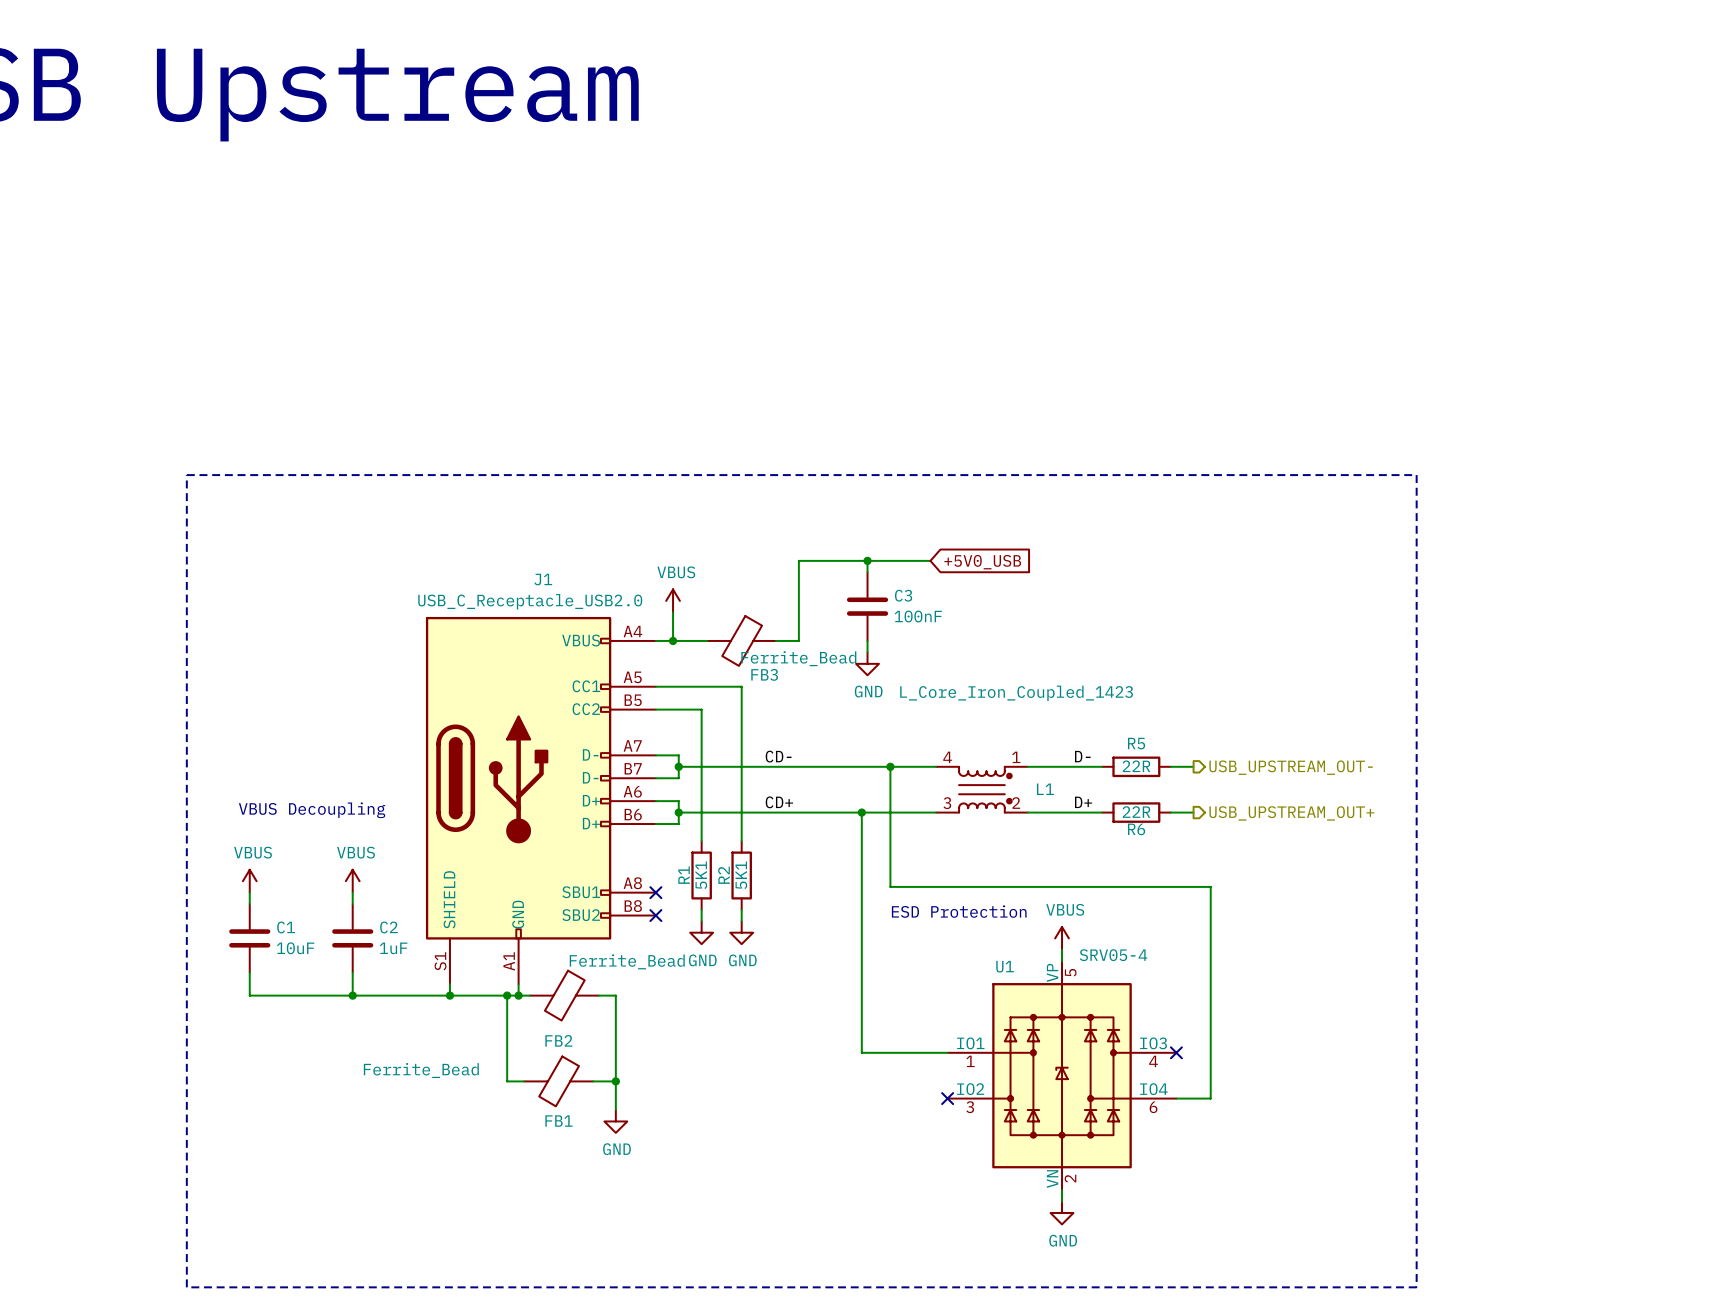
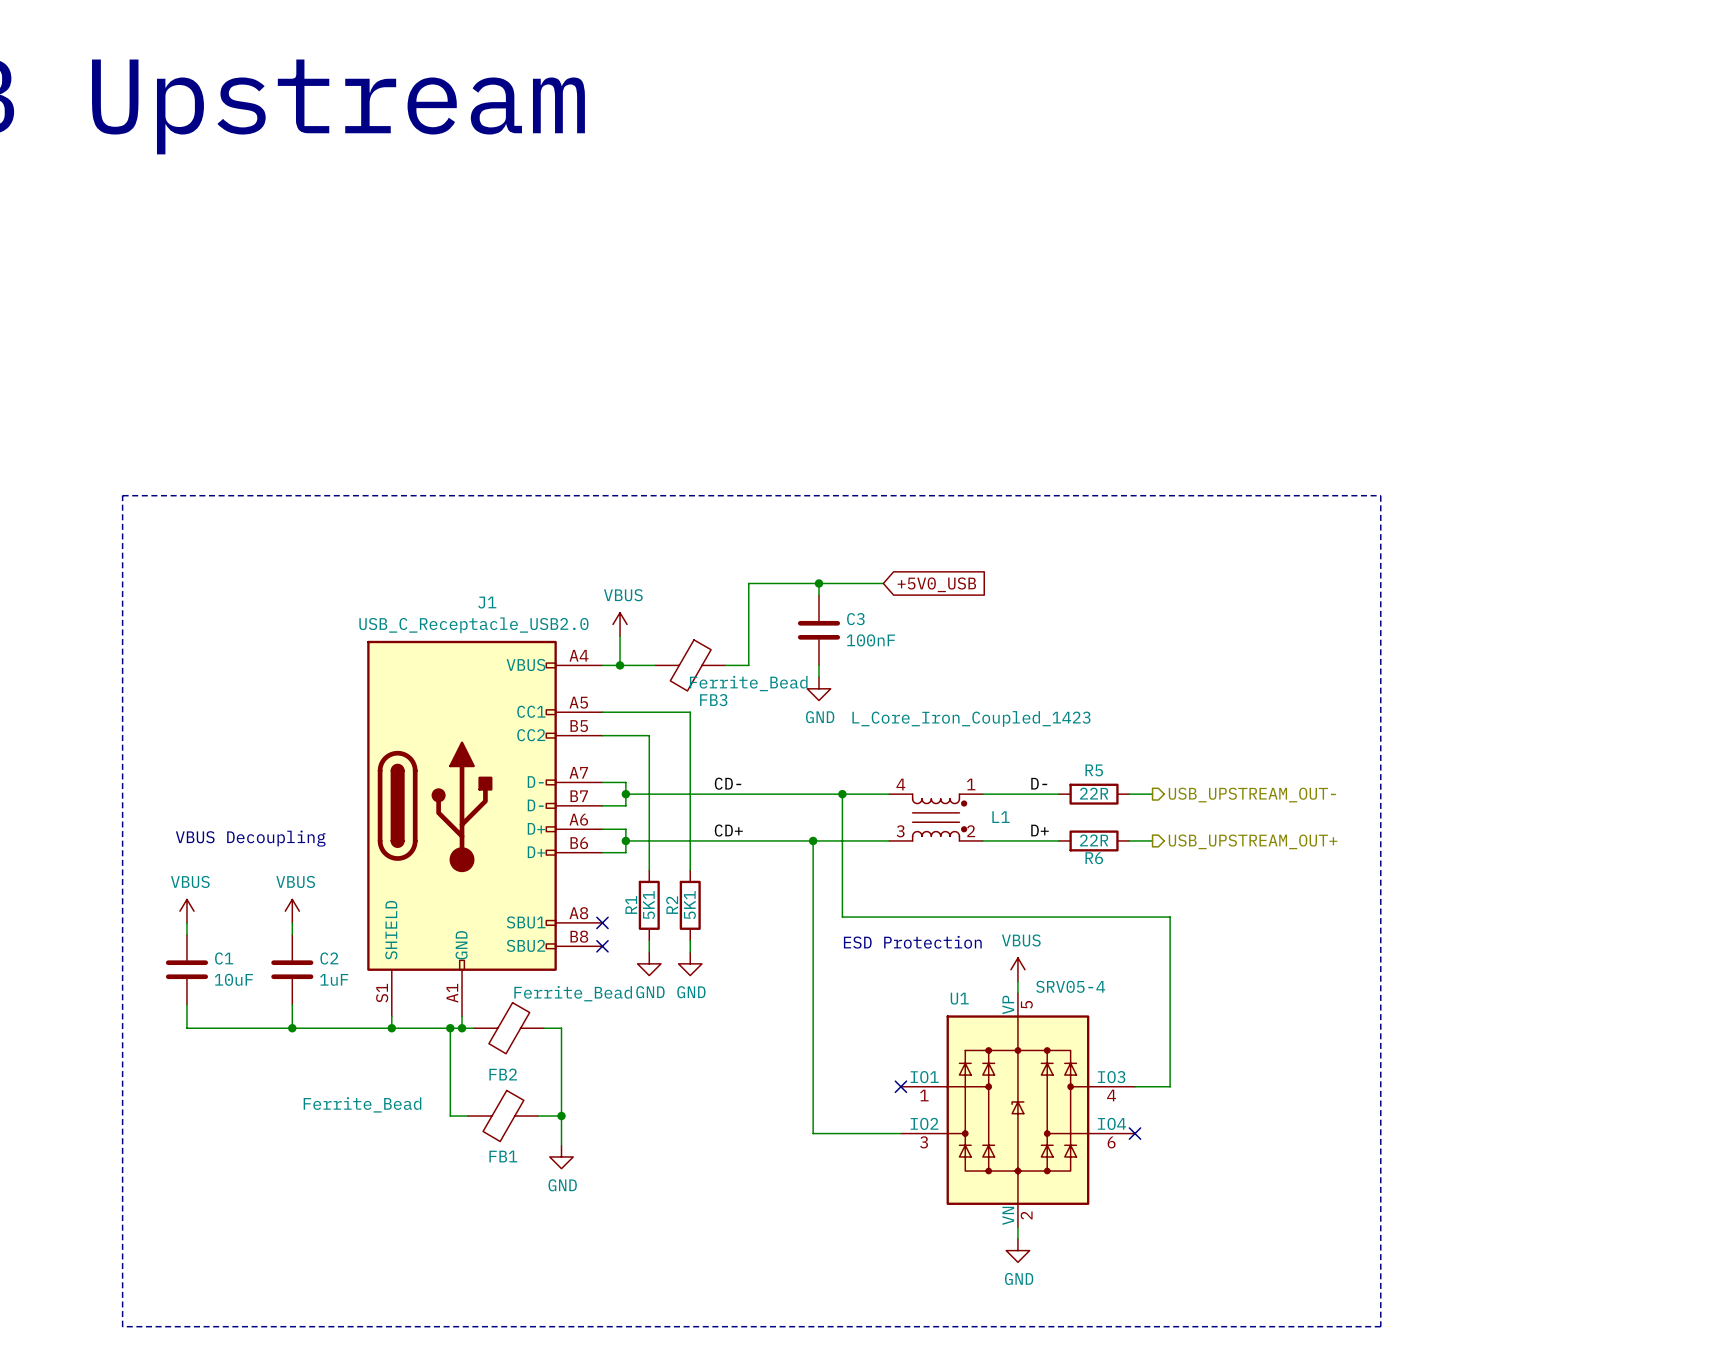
wire: (861, 1052) (947, 1052) -> (813, 1086) (813, 1133) (900, 1133)
no-connect mark position: (1176, 1052) -> (1135, 1133)
wire: (1210, 1052) (1210, 1098) (1176, 1098) -> (1170, 1086) (1135, 1086)
no-connect mark position: (947, 1098) -> (900, 1086)

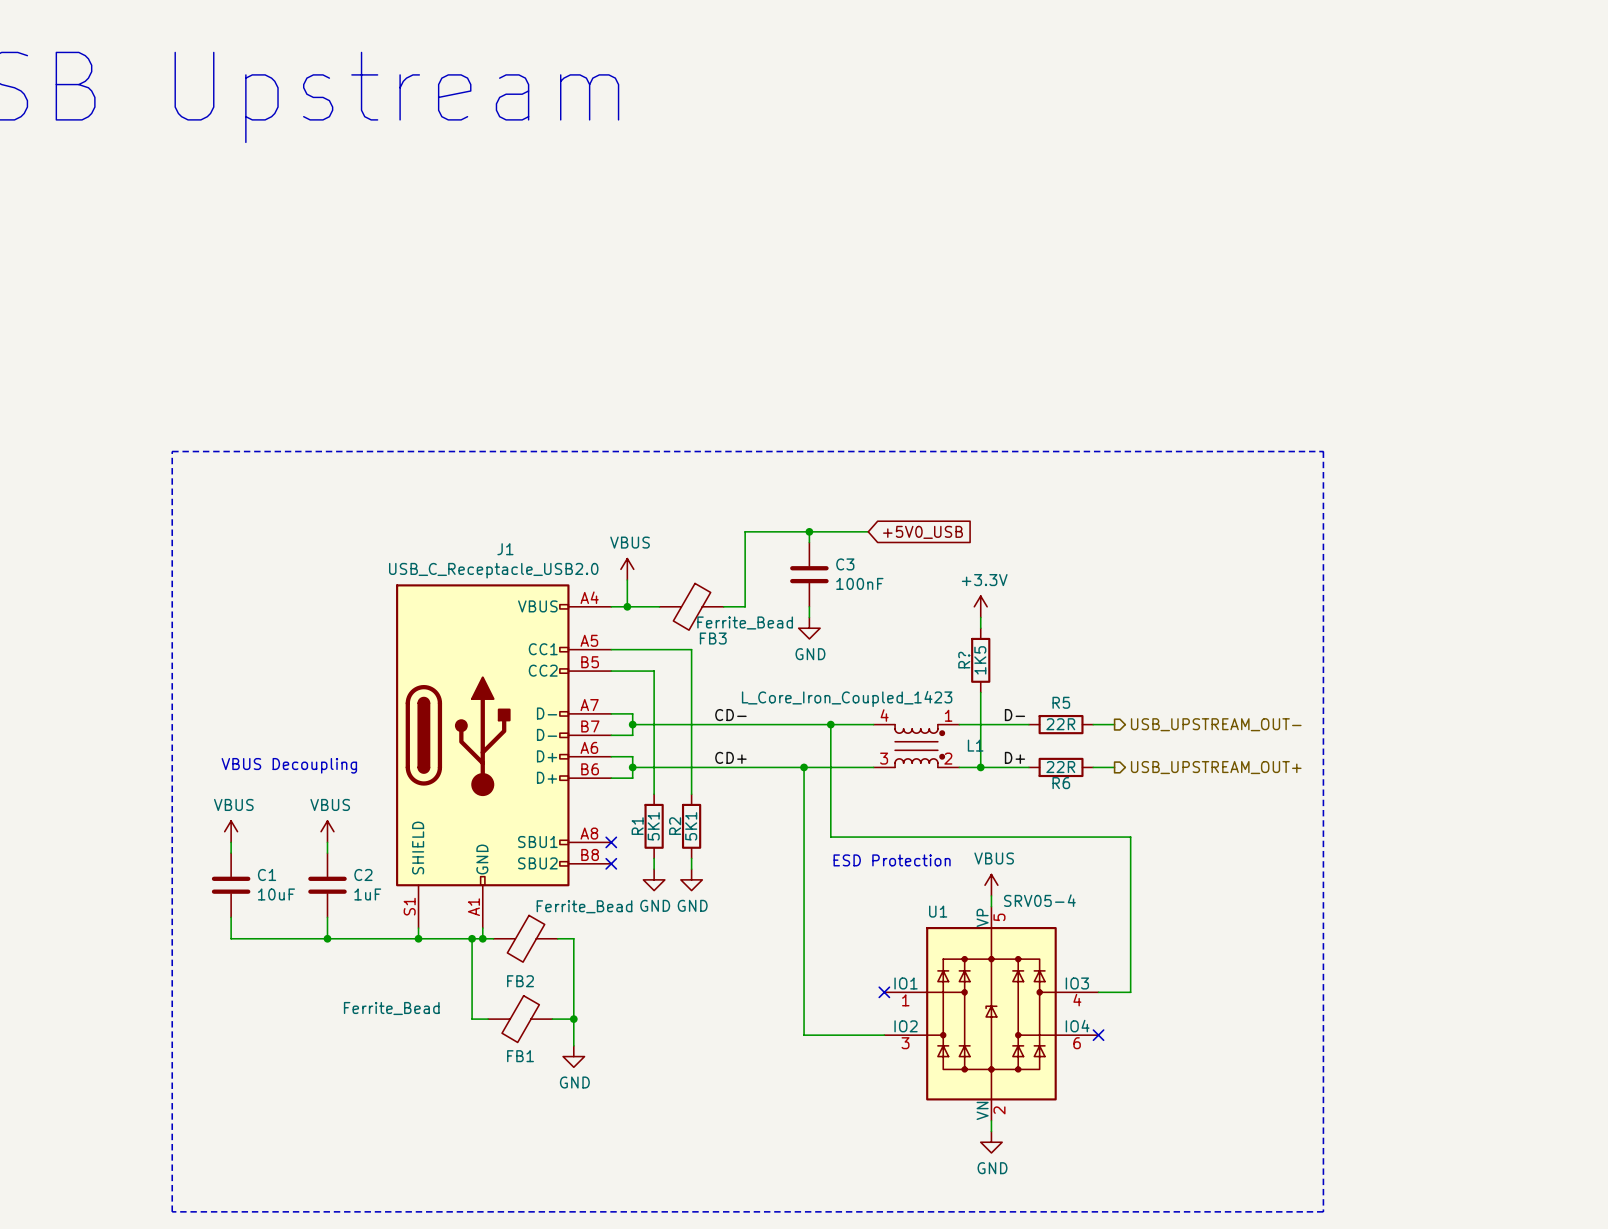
power symbol: none -> +3.3V (980, 606)
wire: none -> (980, 617) (980, 628)
L1 value position: L_Core_Iron_Coupled_1423 (971, 718) -> L_Core_Iron_Coupled_1423 (847, 698)
R?: none -> 1K5 (980, 660)
wire: none -> (980, 692) (980, 767)
junction: none -> (980, 767)

